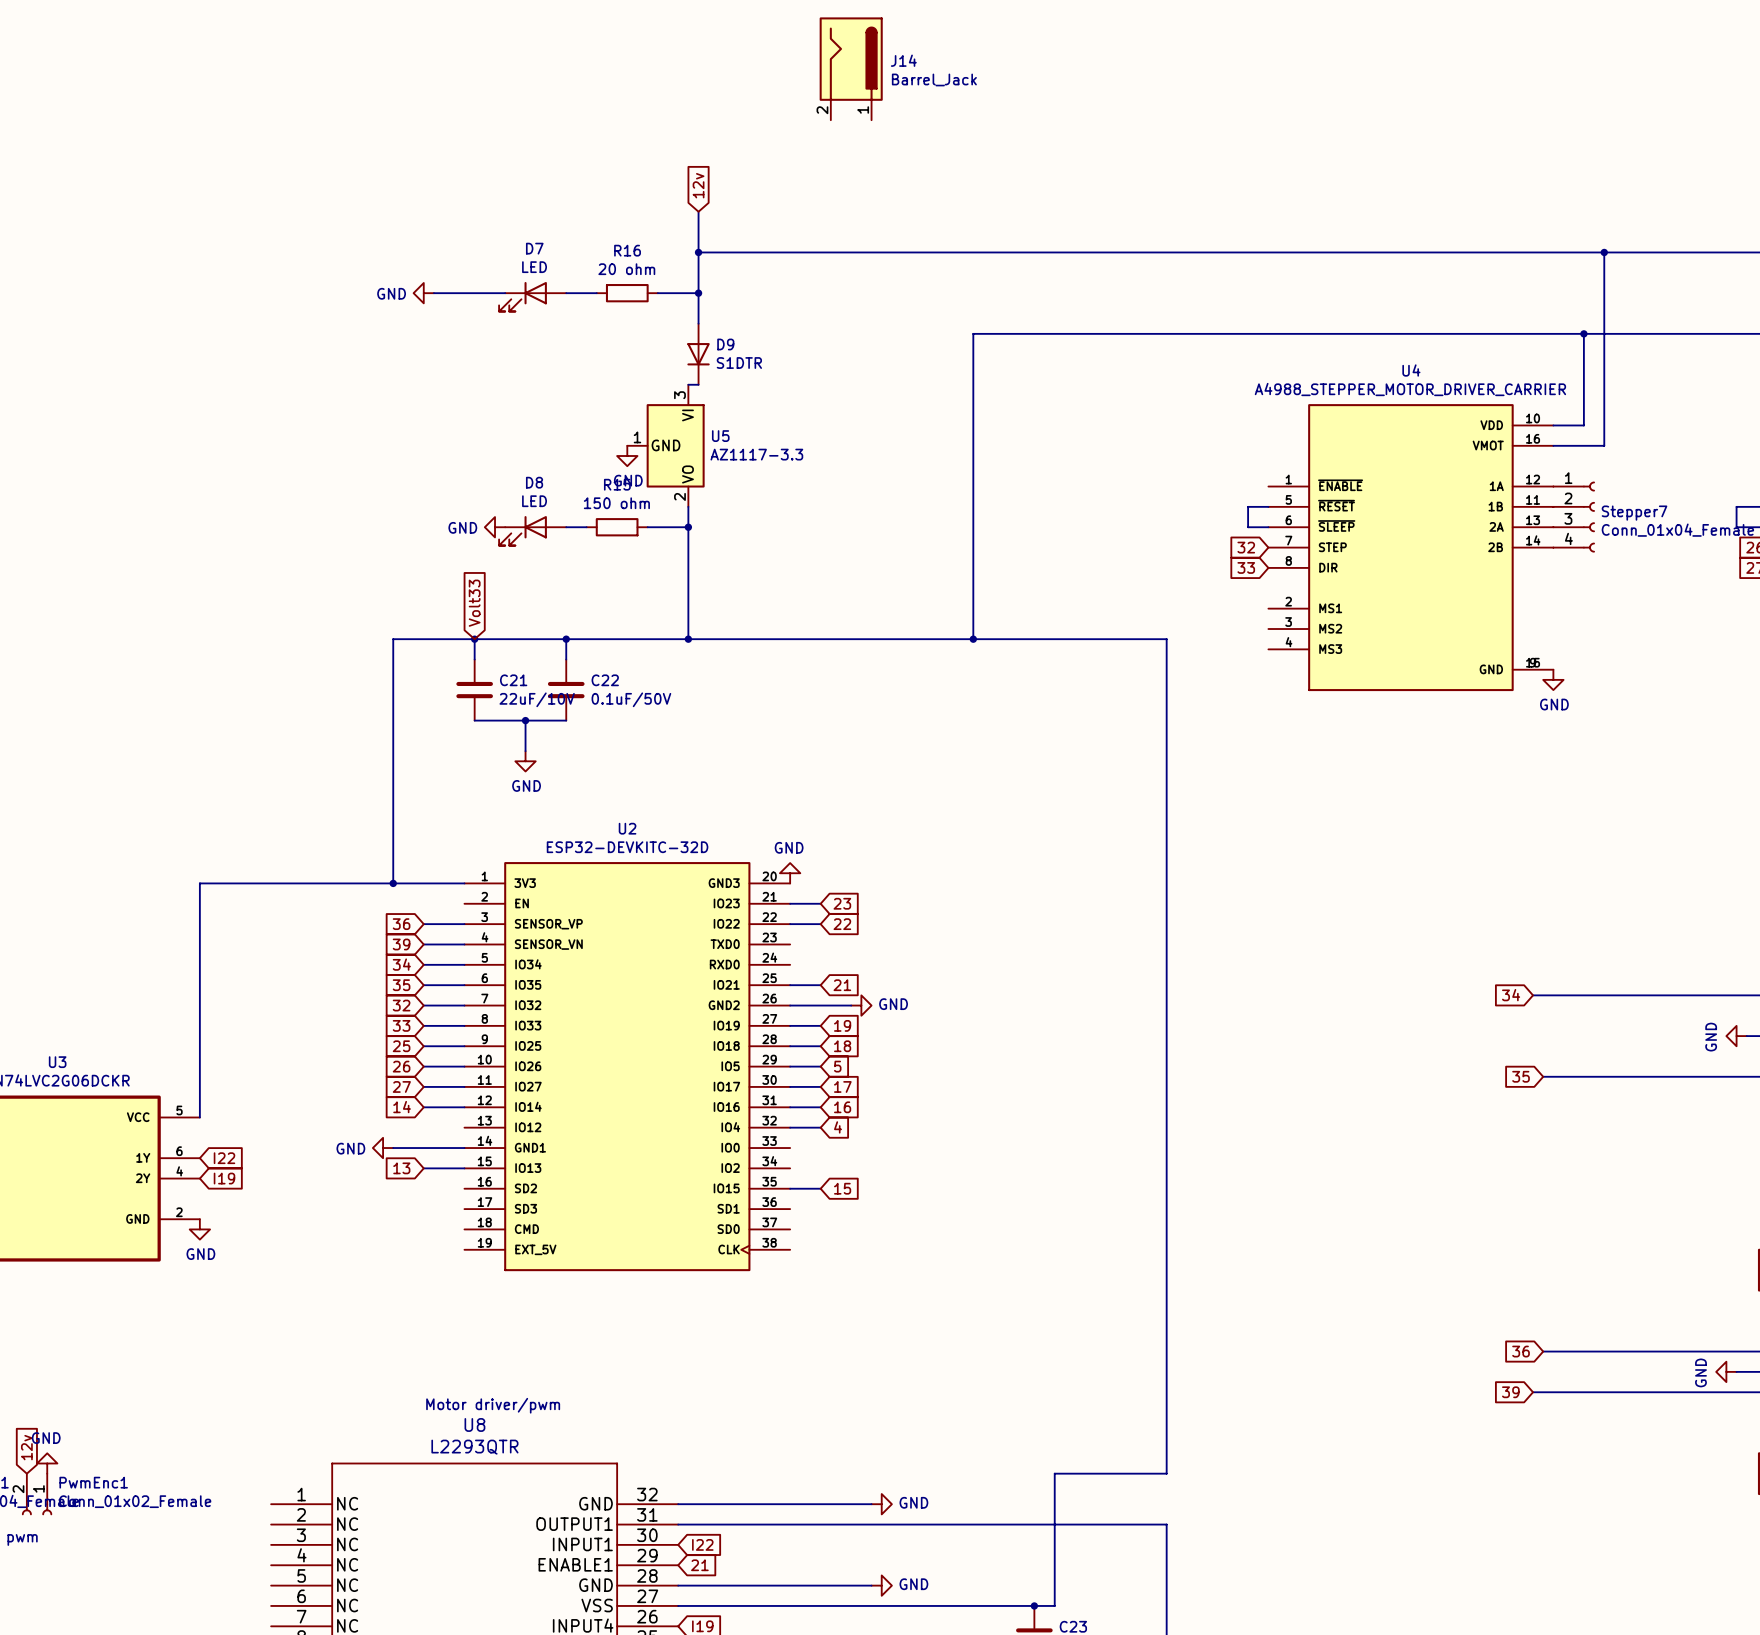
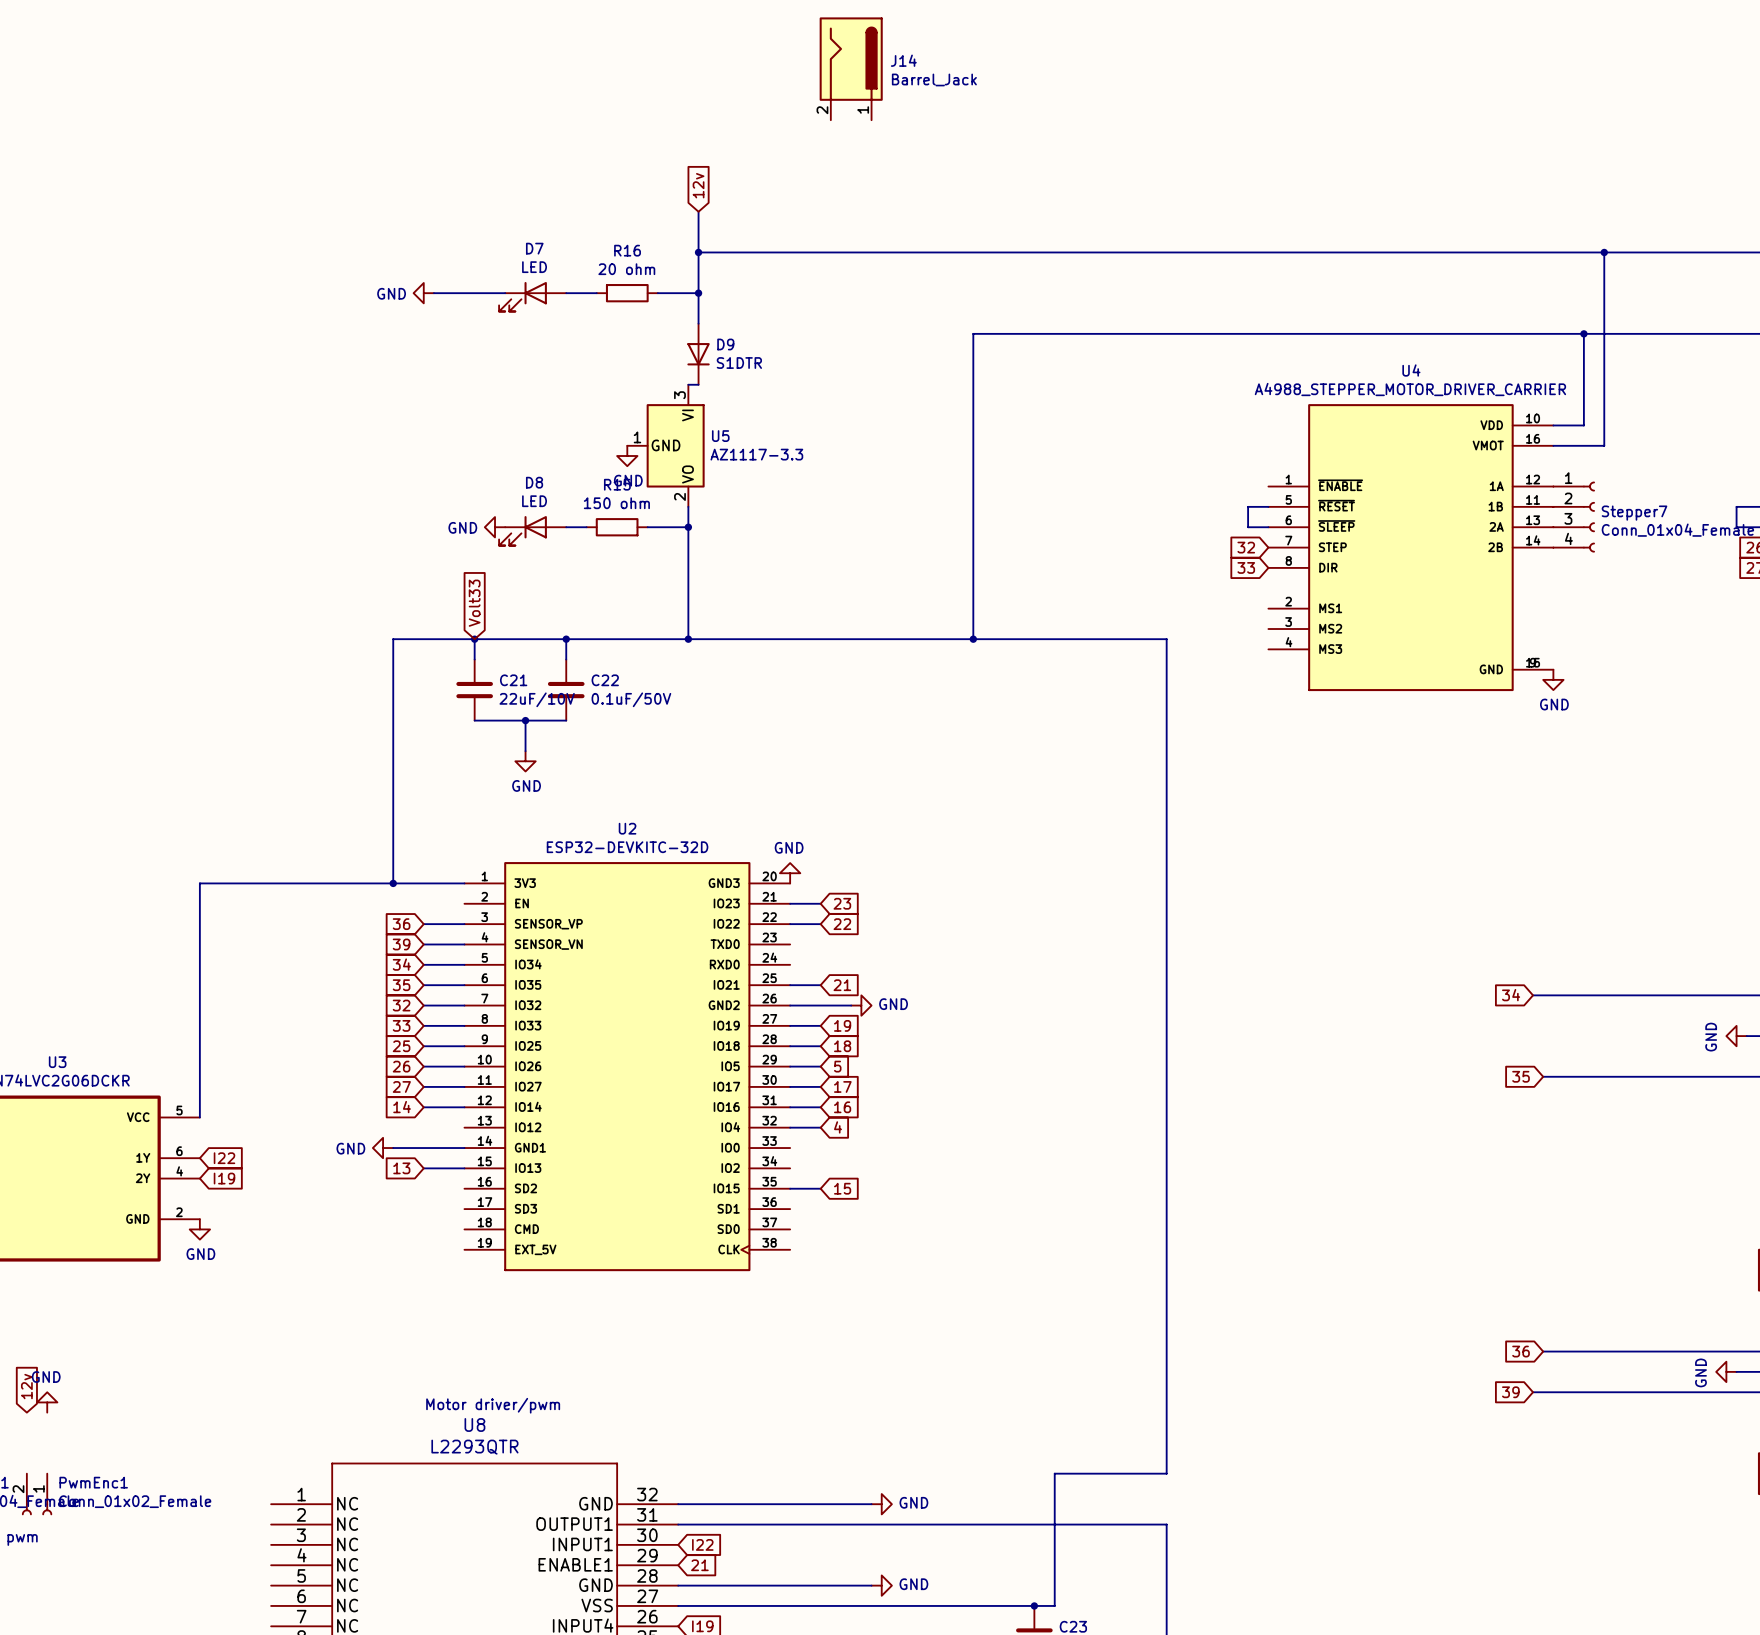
global label position: 12v (26, 1447) -> 12v (26, 1386)
power symbol position: GND (47, 1463) -> GND (47, 1402)

